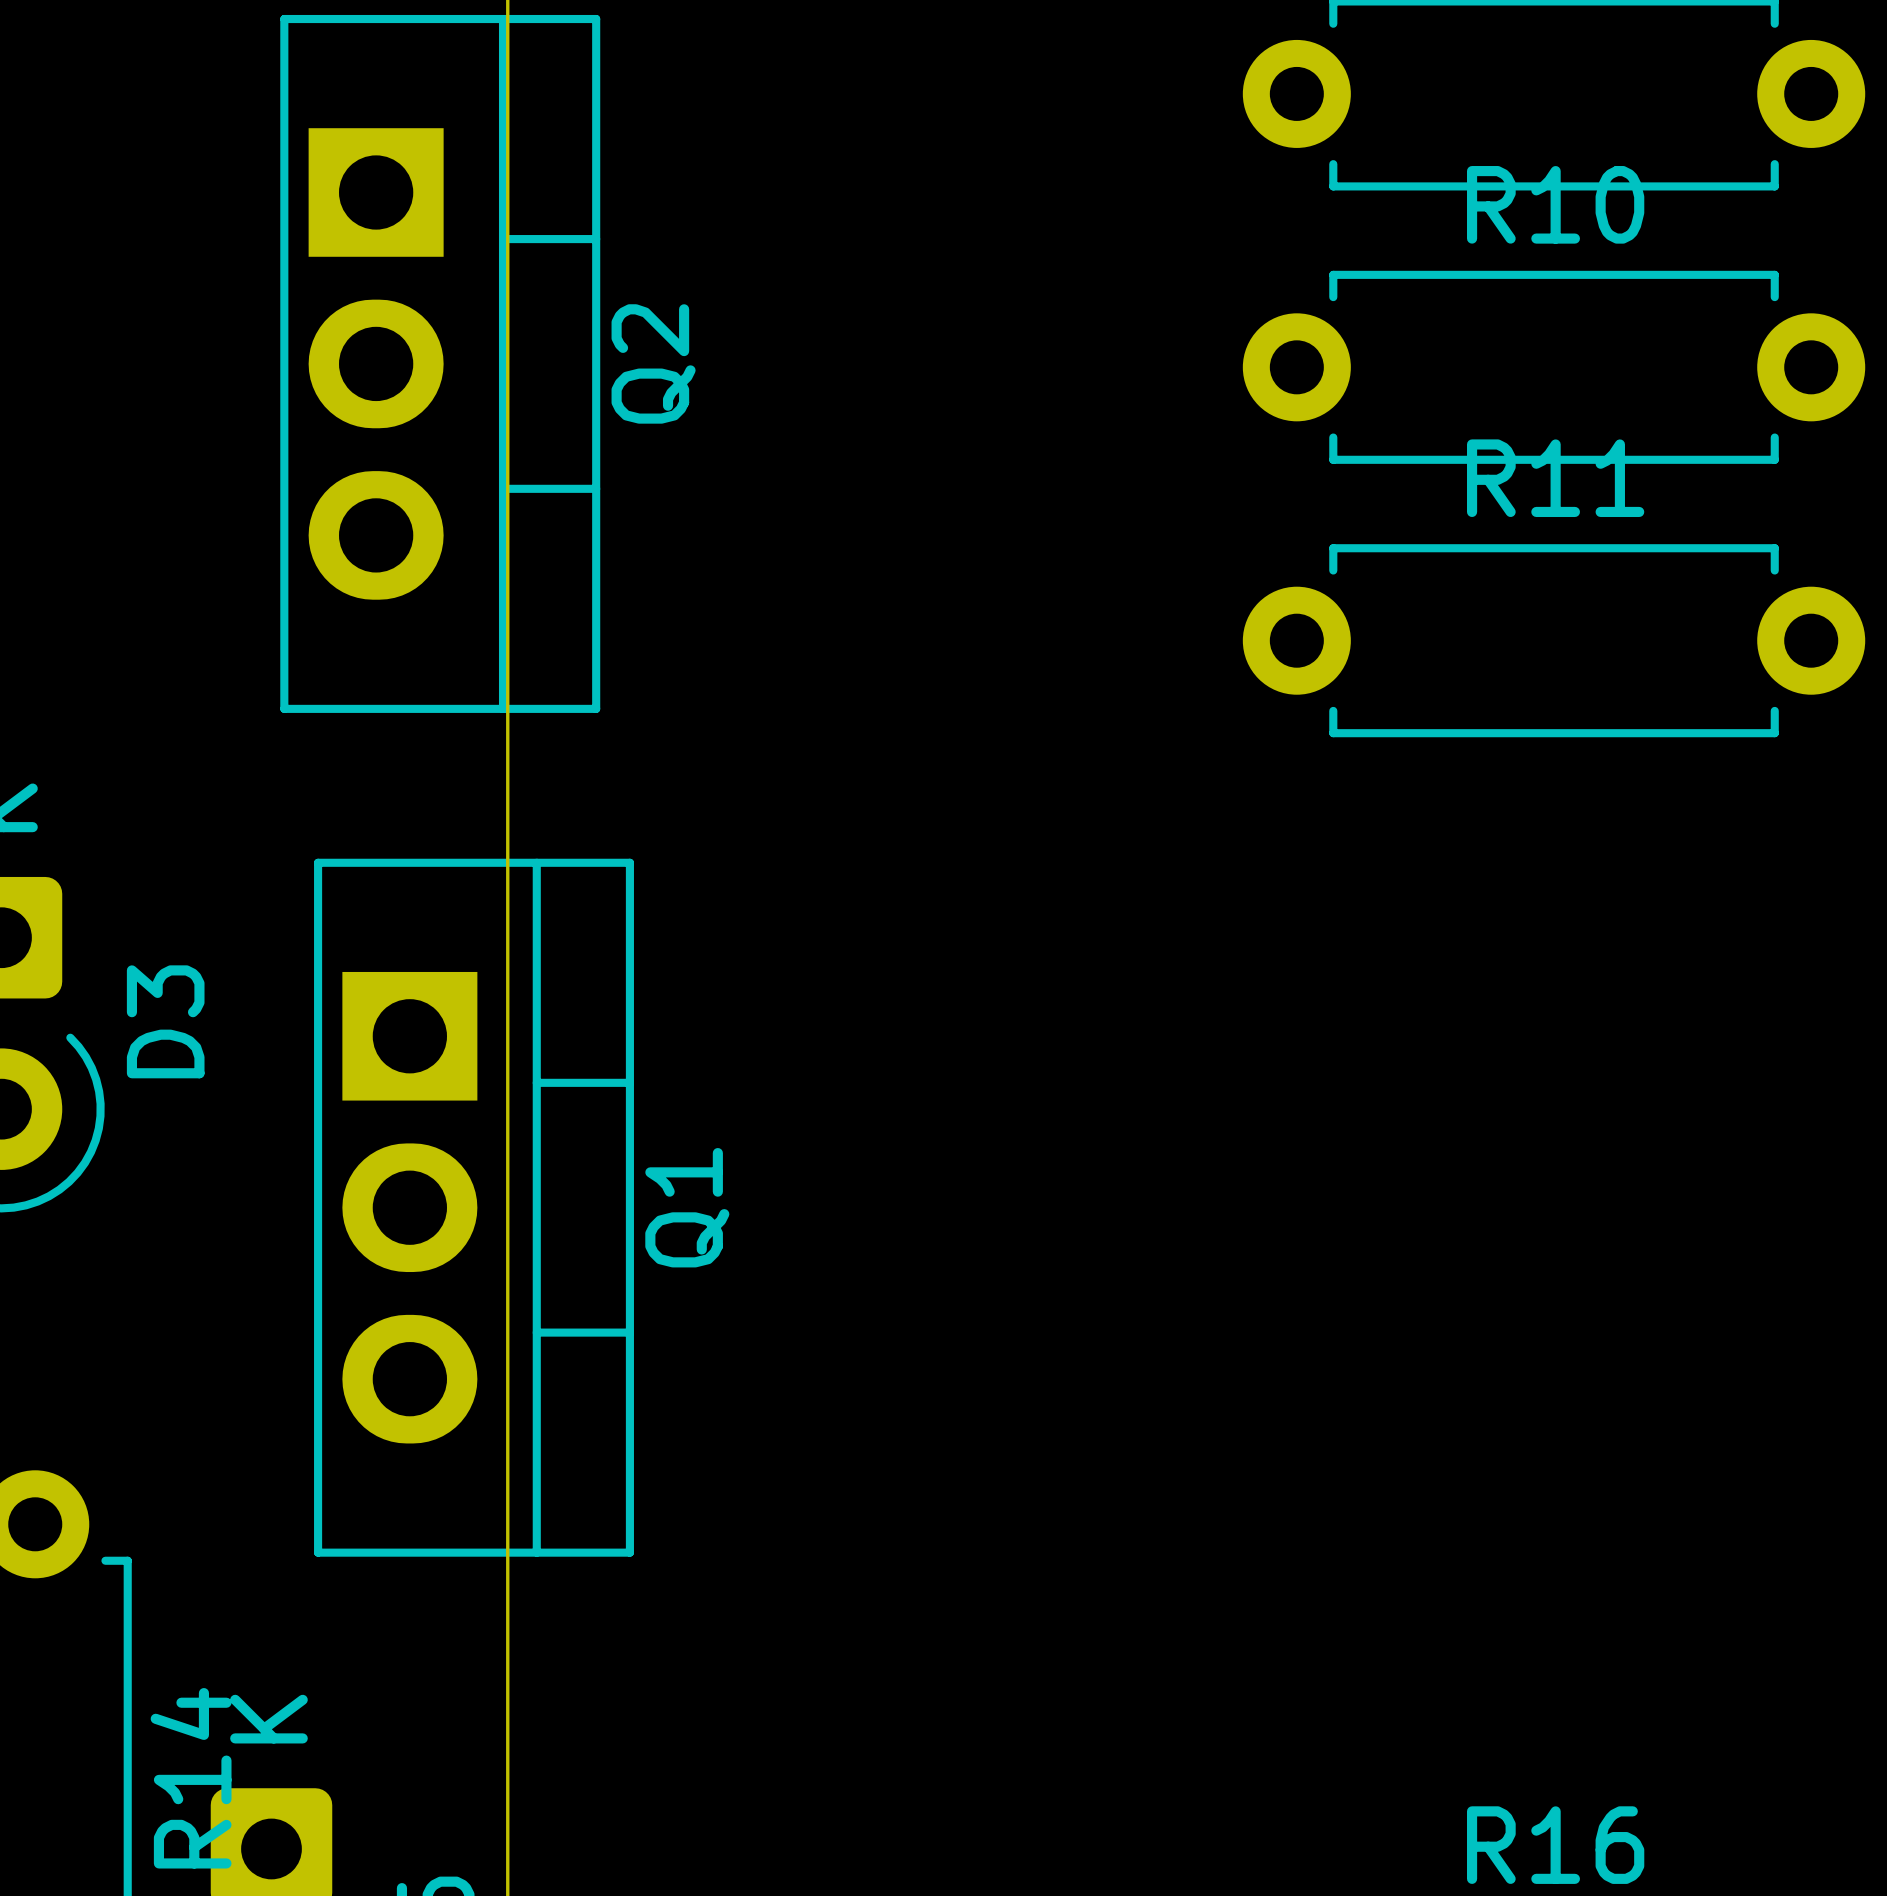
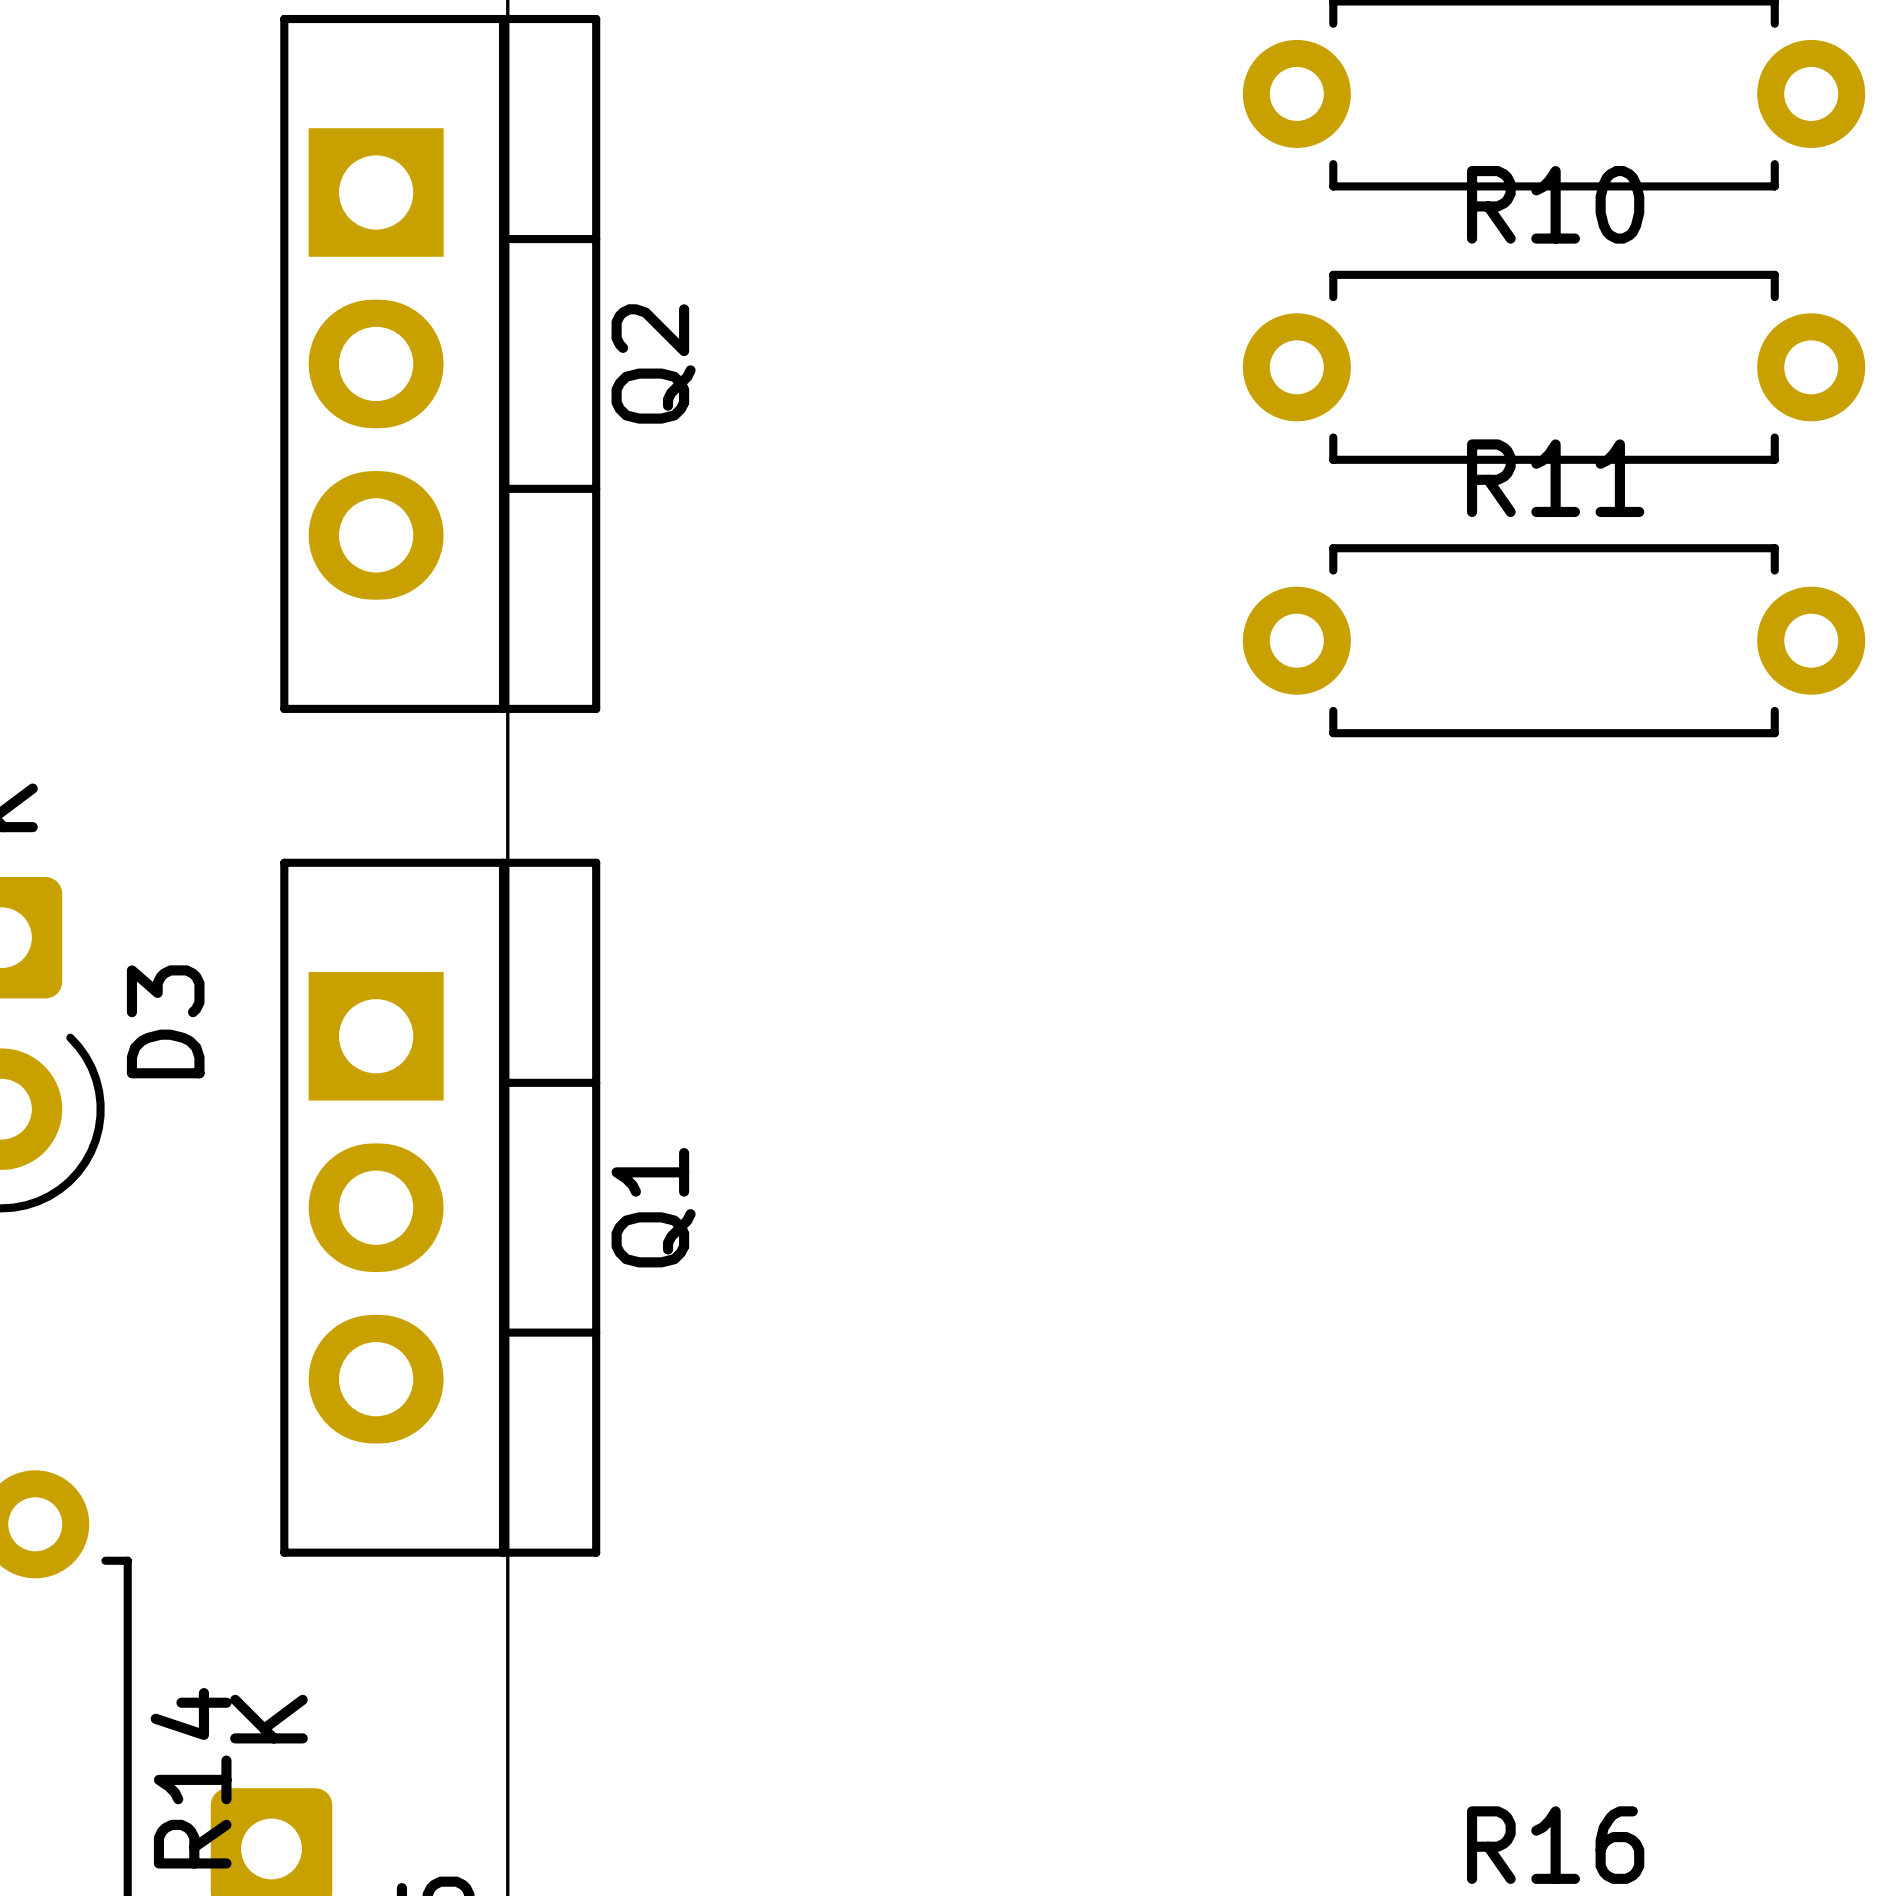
Q1 position: (474, 1207) -> (440, 1207)

